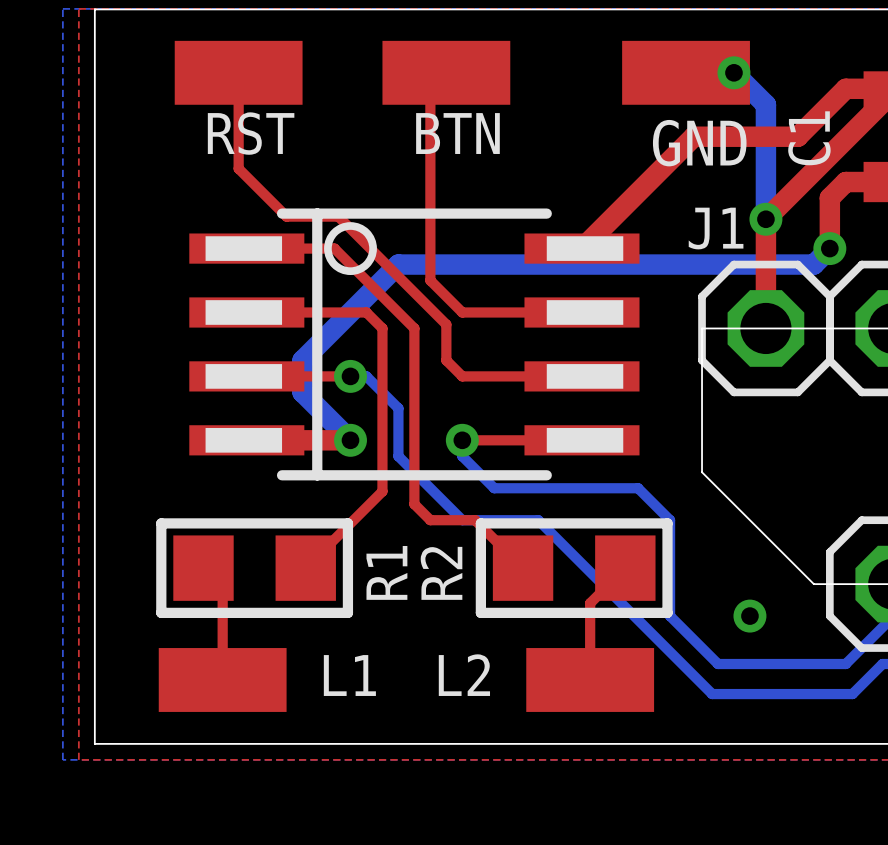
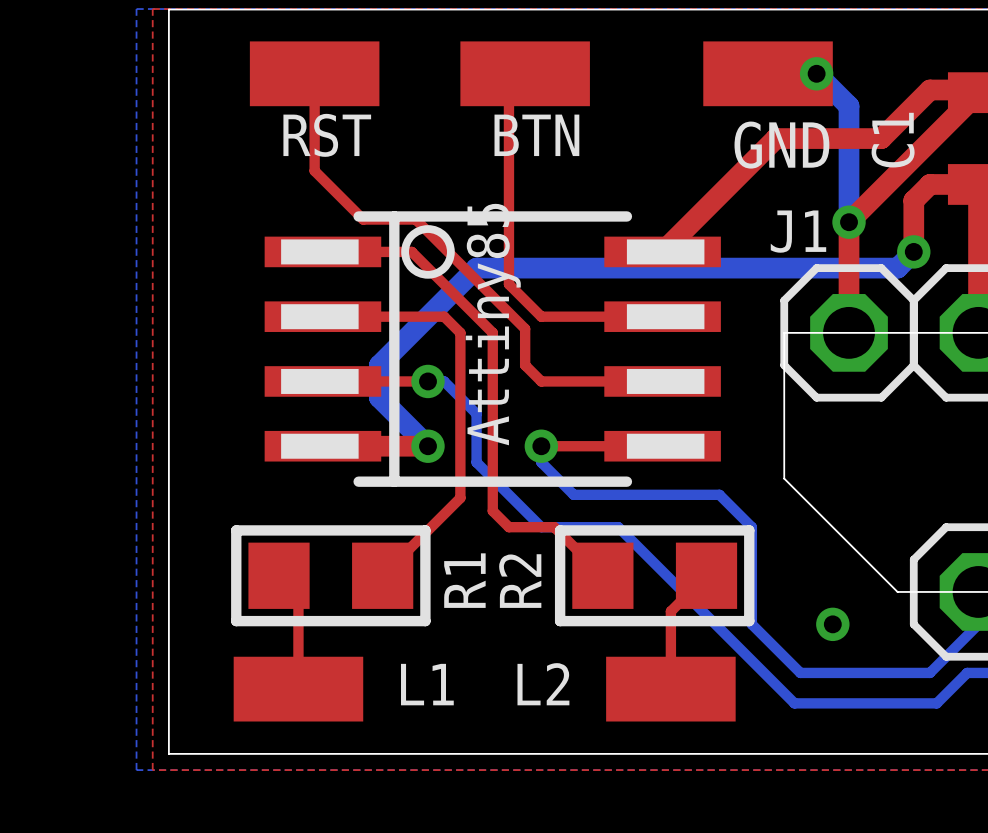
text: none -> Attiny85 (493, 324)

